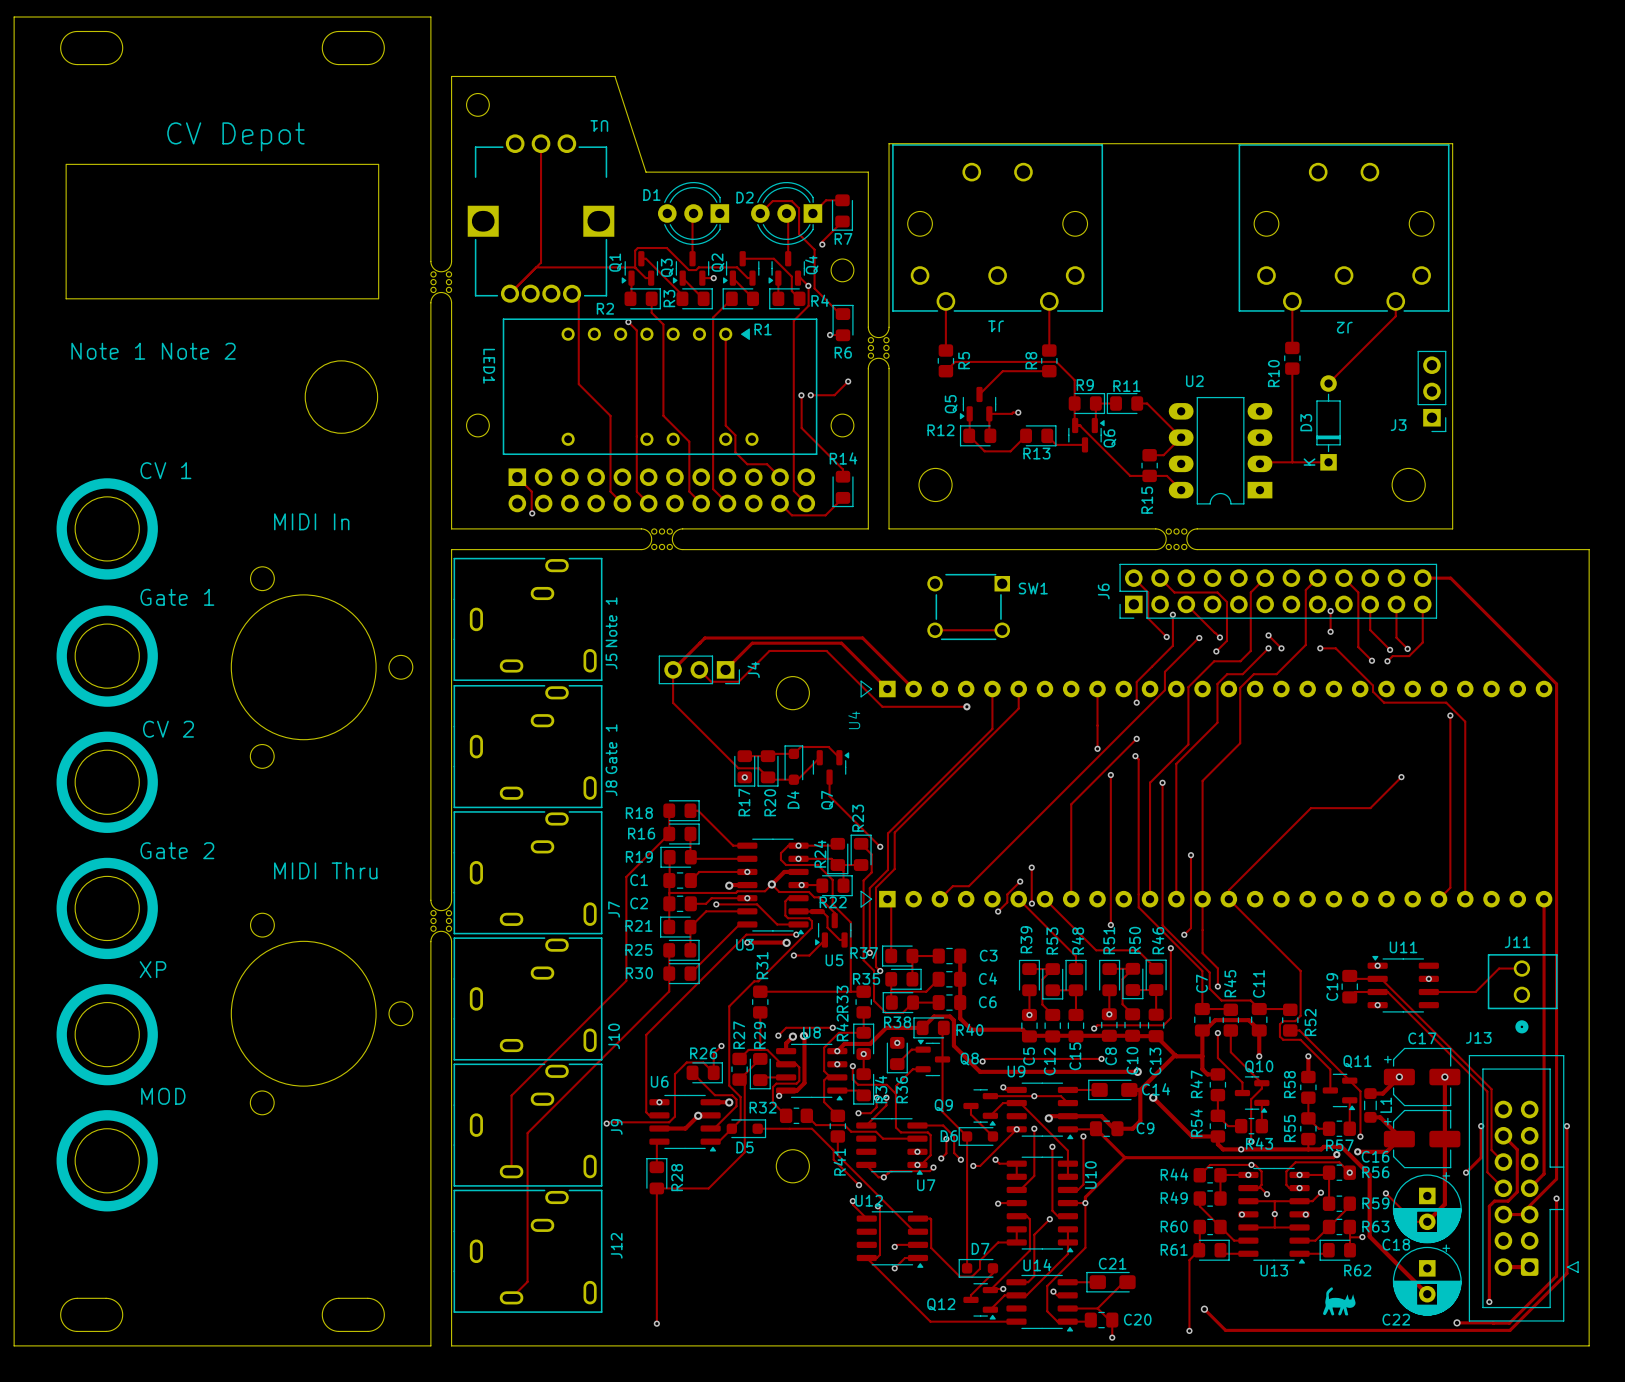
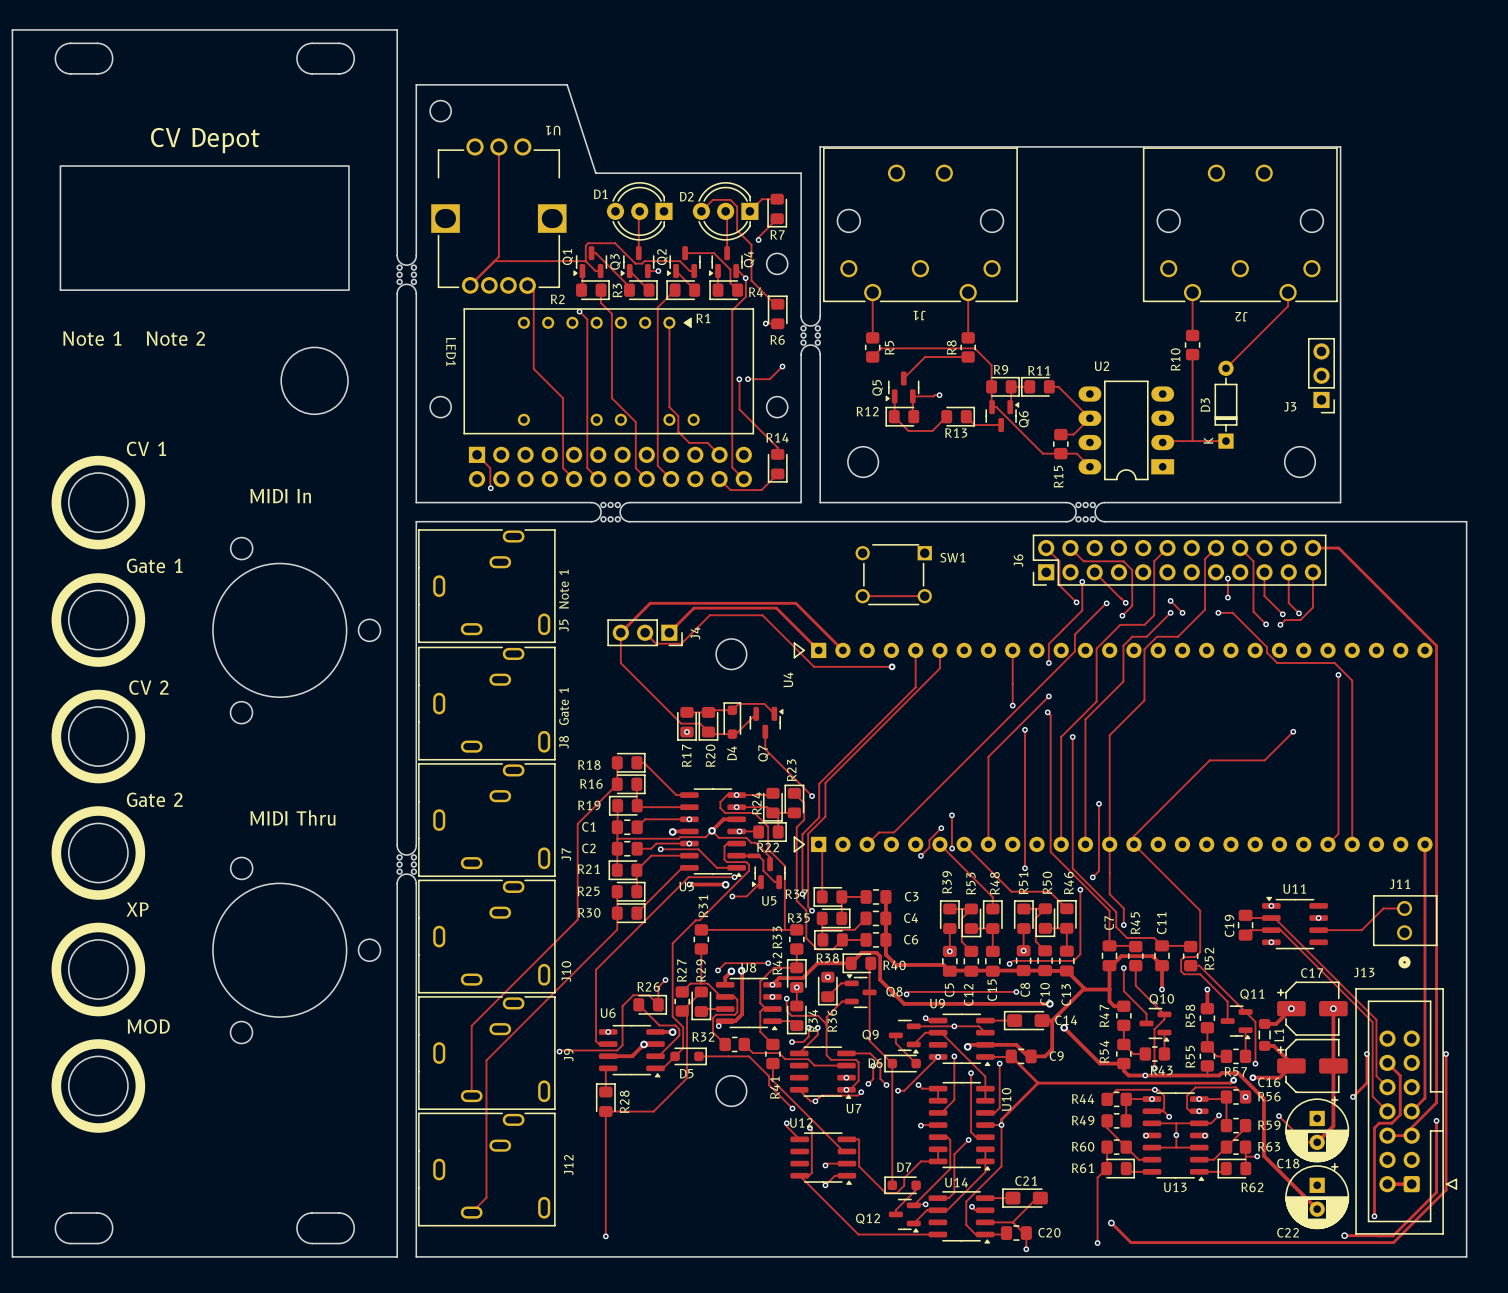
drawing: [1323, 1287, 1356, 1316] -> none

